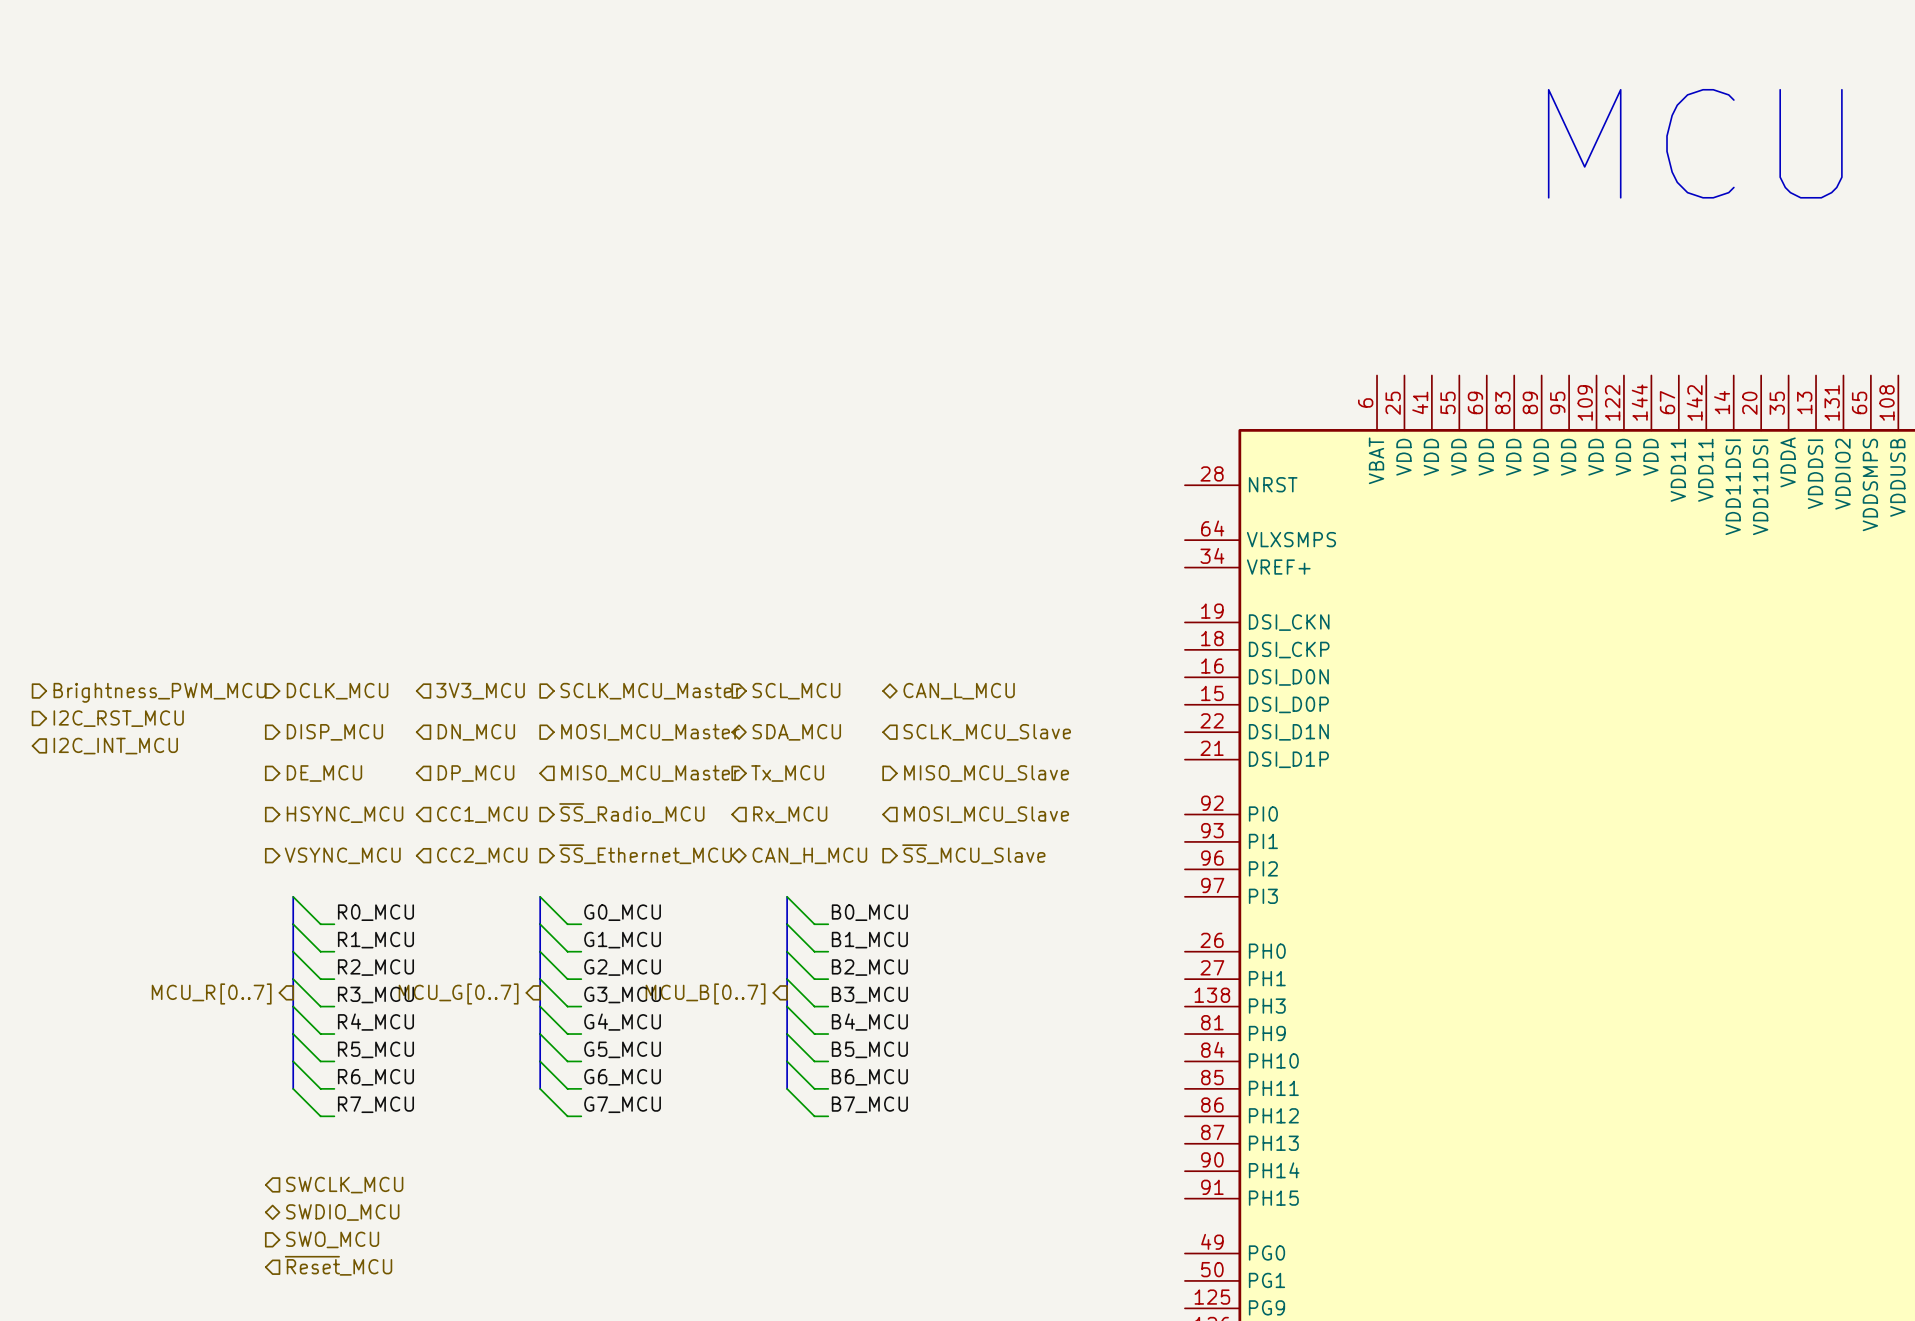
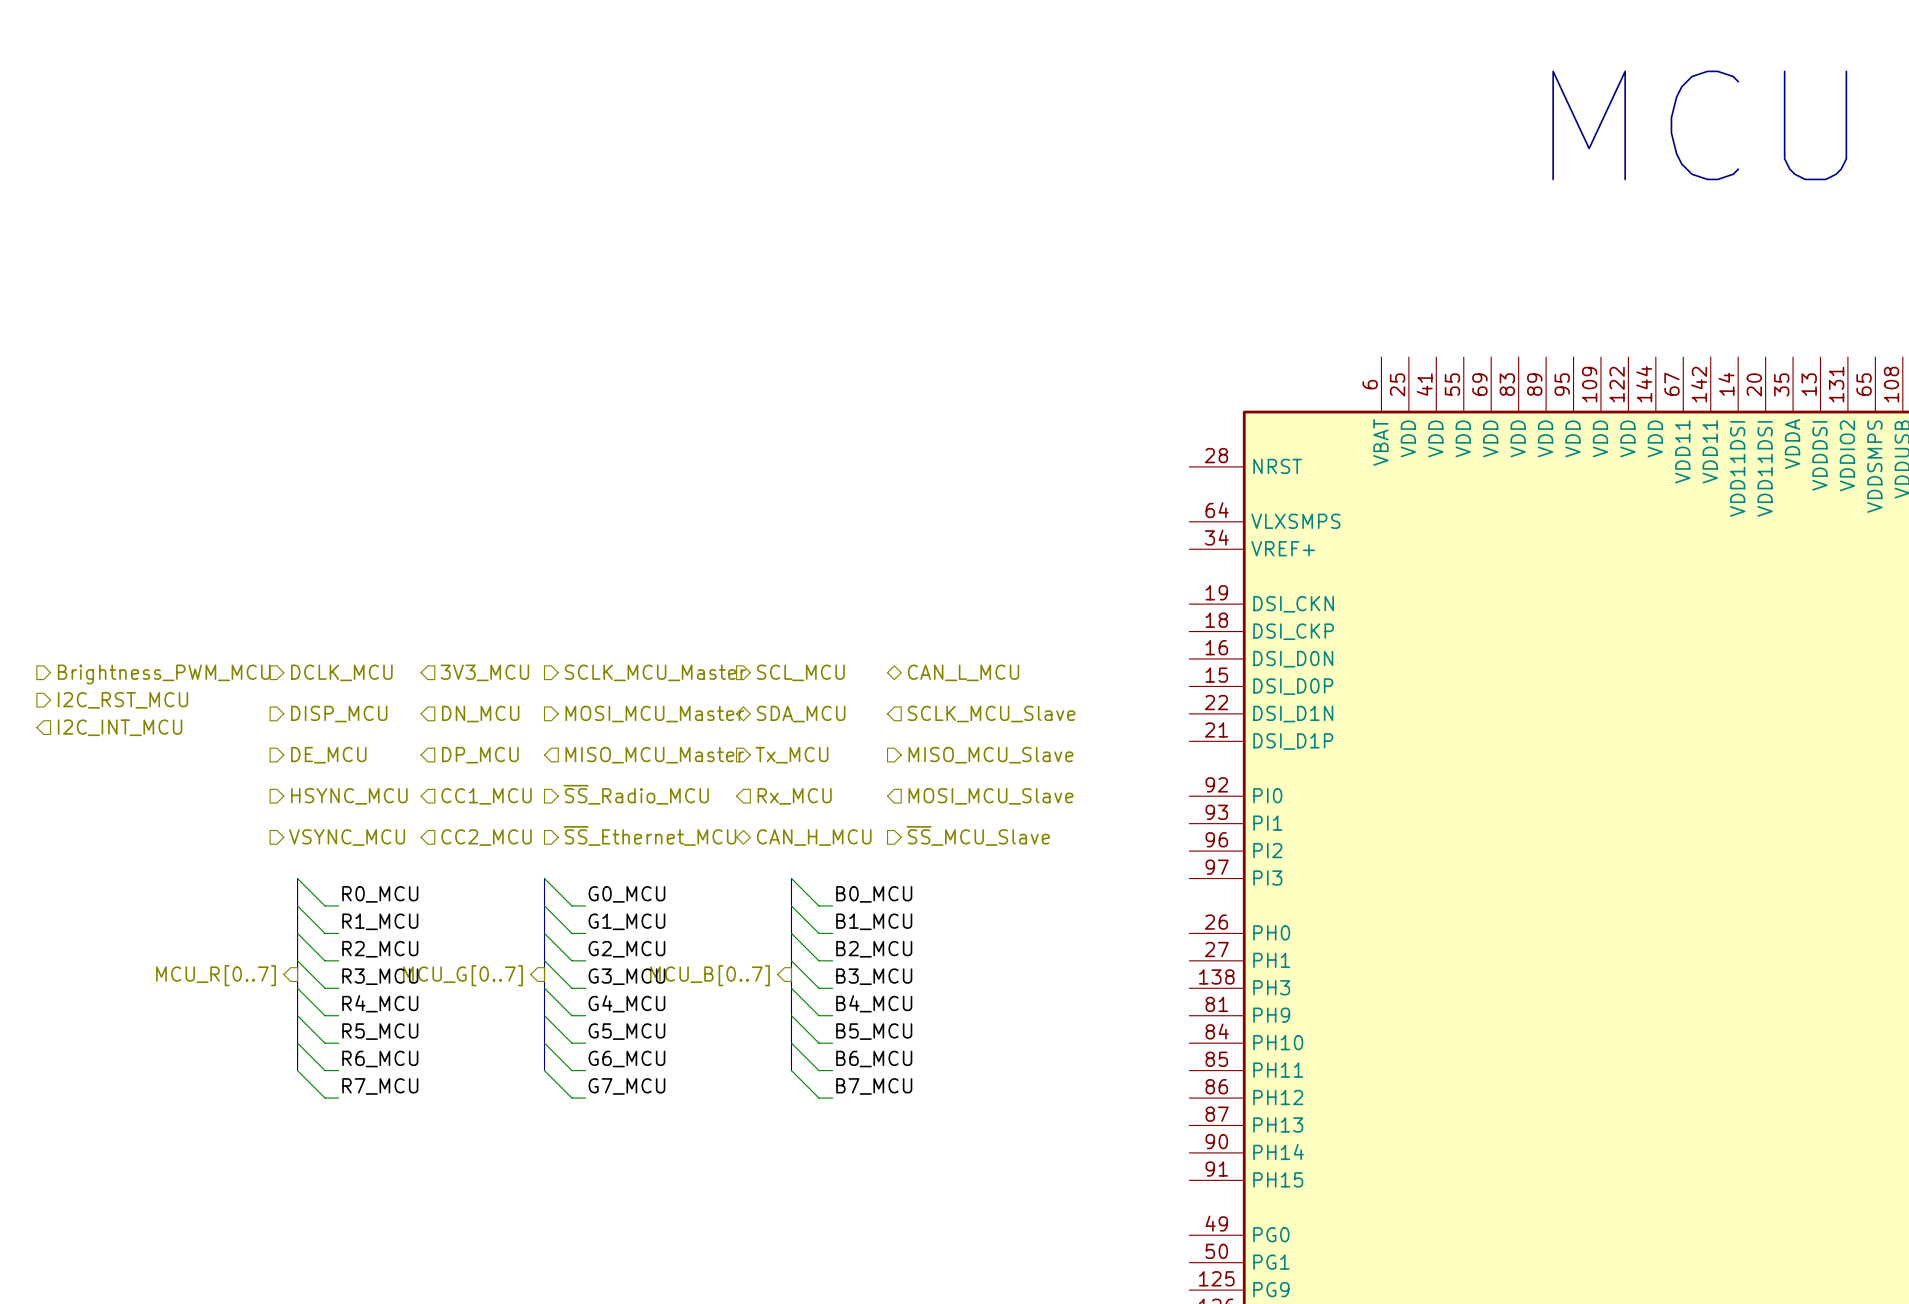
hierarchical label: SWCLK_MCU (344, 1185) -> none
hierarchical label: SWDIO_MCU (342, 1212) -> none
hierarchical label: SWO_MCU (332, 1239) -> none
hierarchical label: ~{Reset}_MCU (338, 1265) -> none

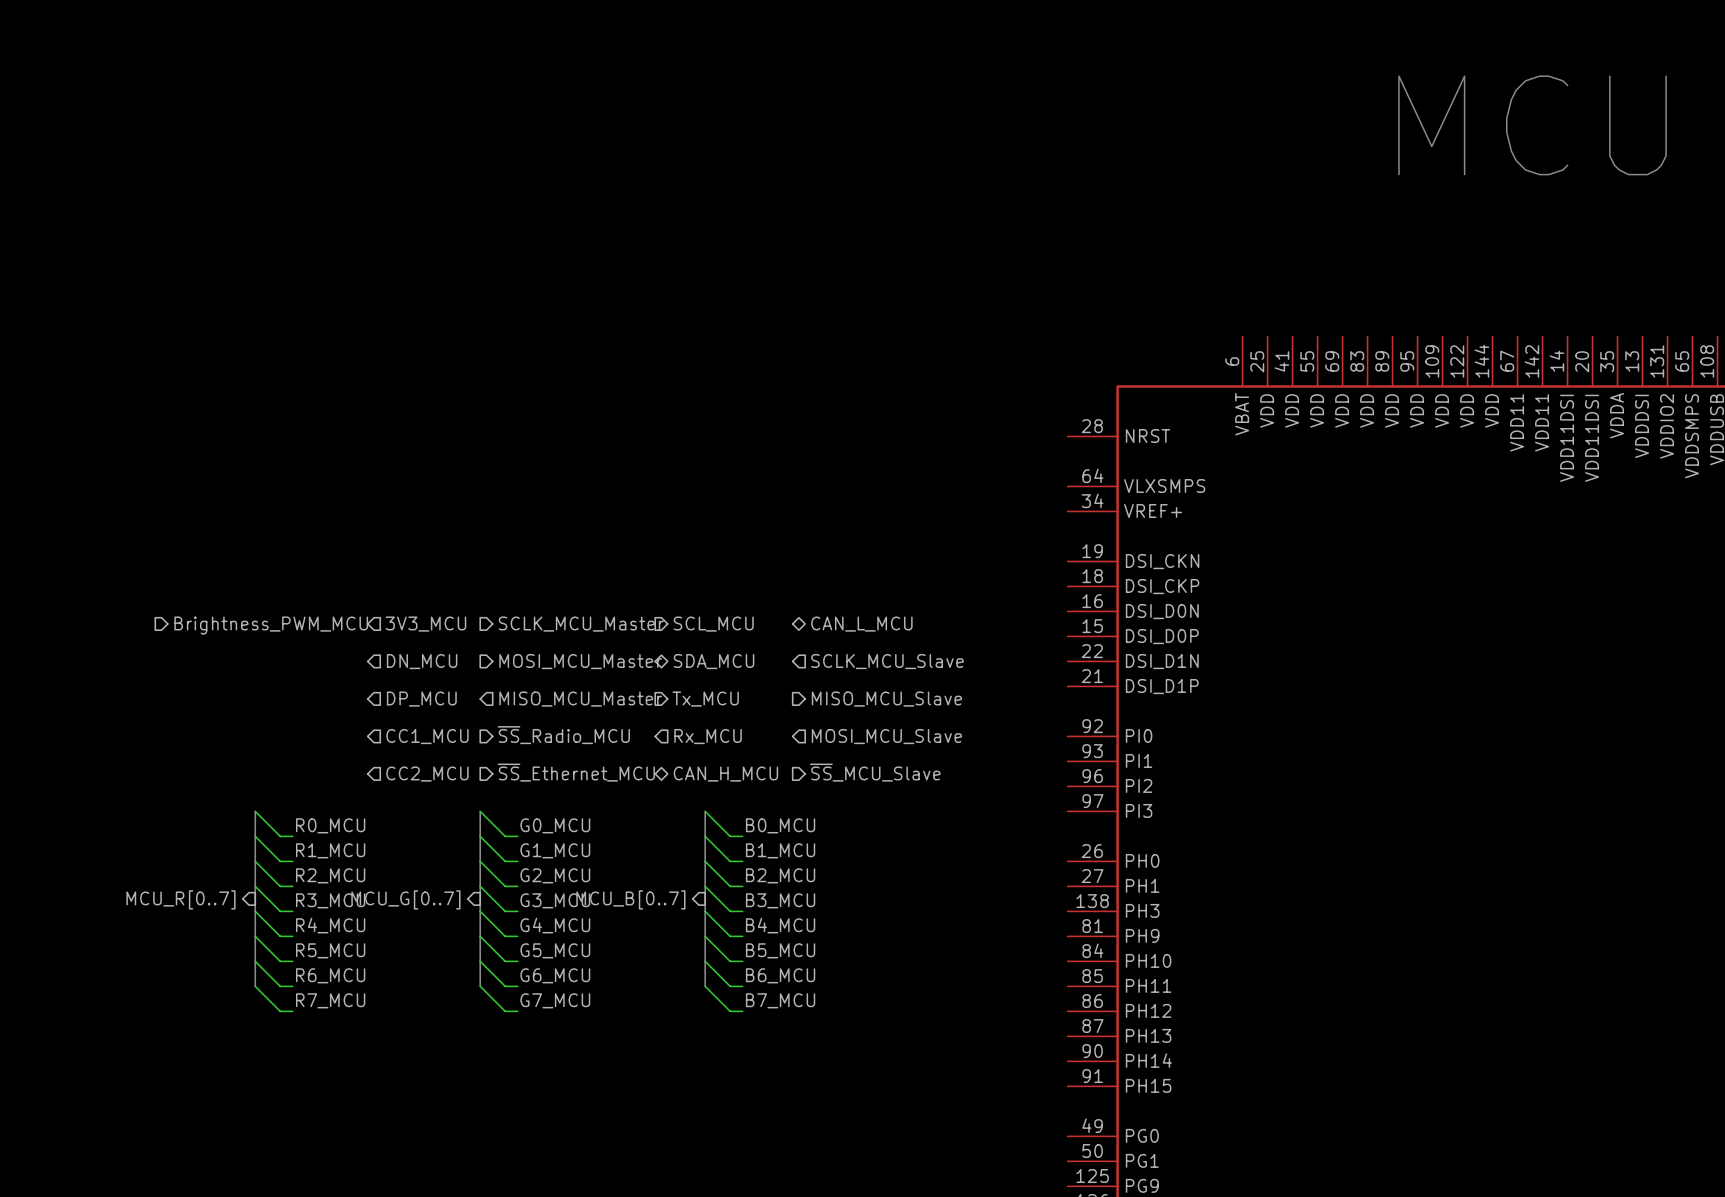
hierarchical label: DCLK_MCU (341, 672) -> none
hierarchical label position: Brightness_PWM_MCU (164, 674) -> Brightness_PWM_MCU (271, 625)
hierarchical label: I2C_RST_MCU (123, 700) -> none
hierarchical label: DISP_MCU (339, 714) -> none
hierarchical label: I2C_INT_MCU (120, 727) -> none
hierarchical label: DE_MCU (328, 755) -> none
hierarchical label: HSYNC_MCU (349, 796) -> none
hierarchical label: VSYNC_MCU (347, 837) -> none

